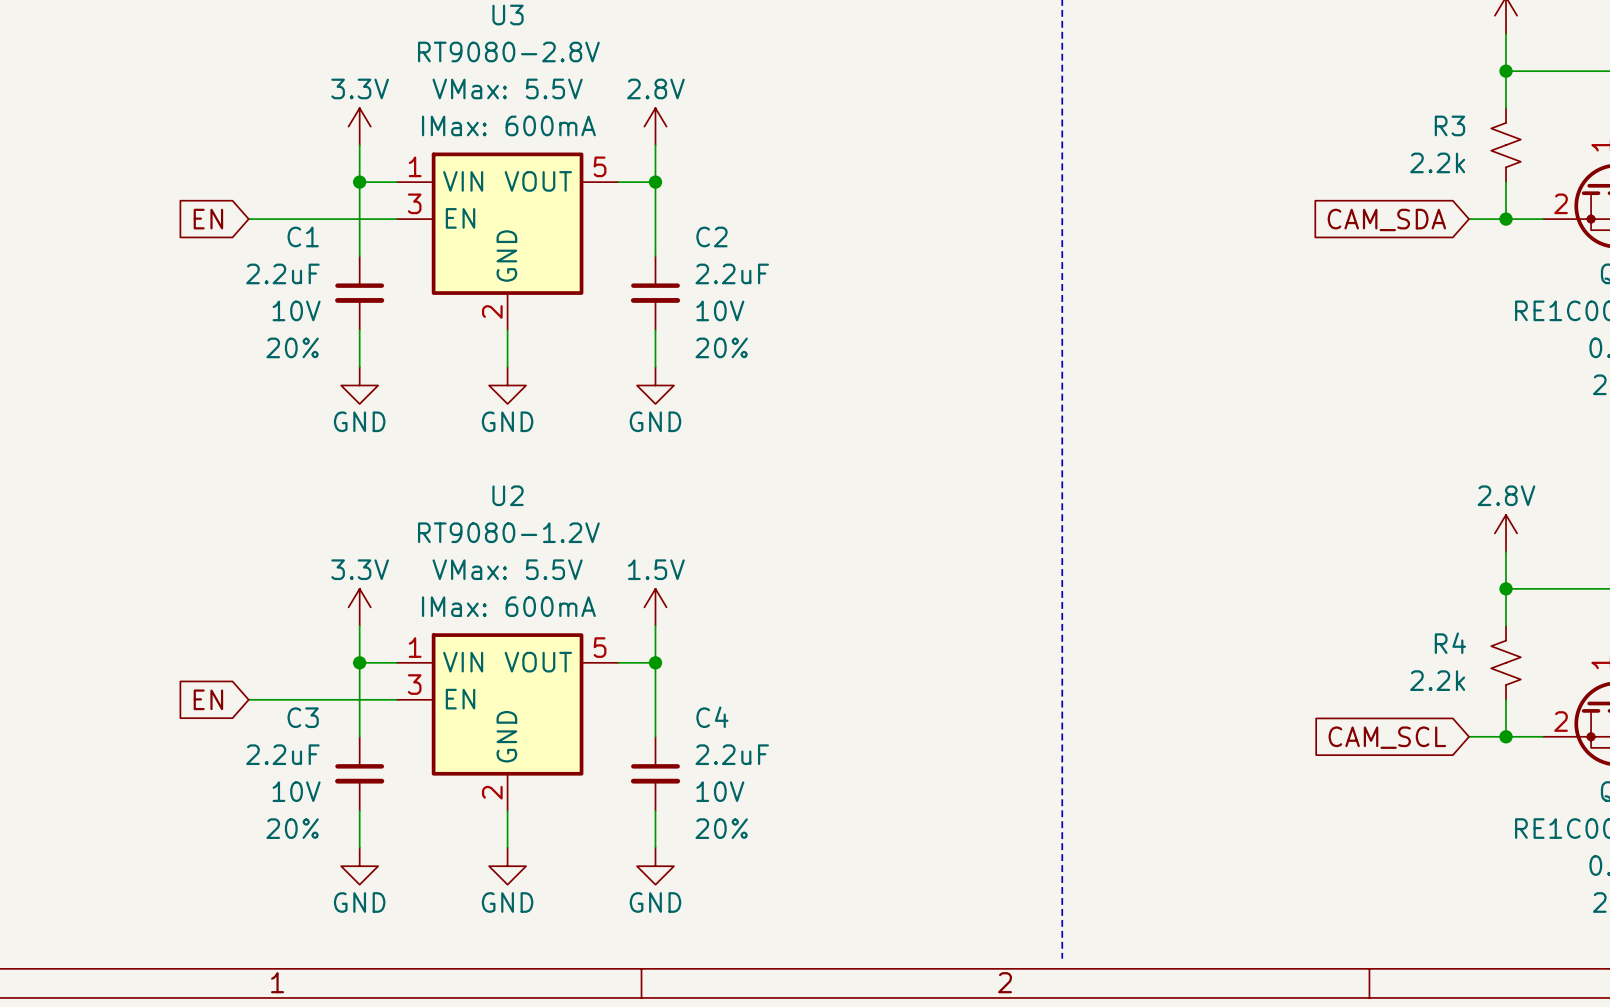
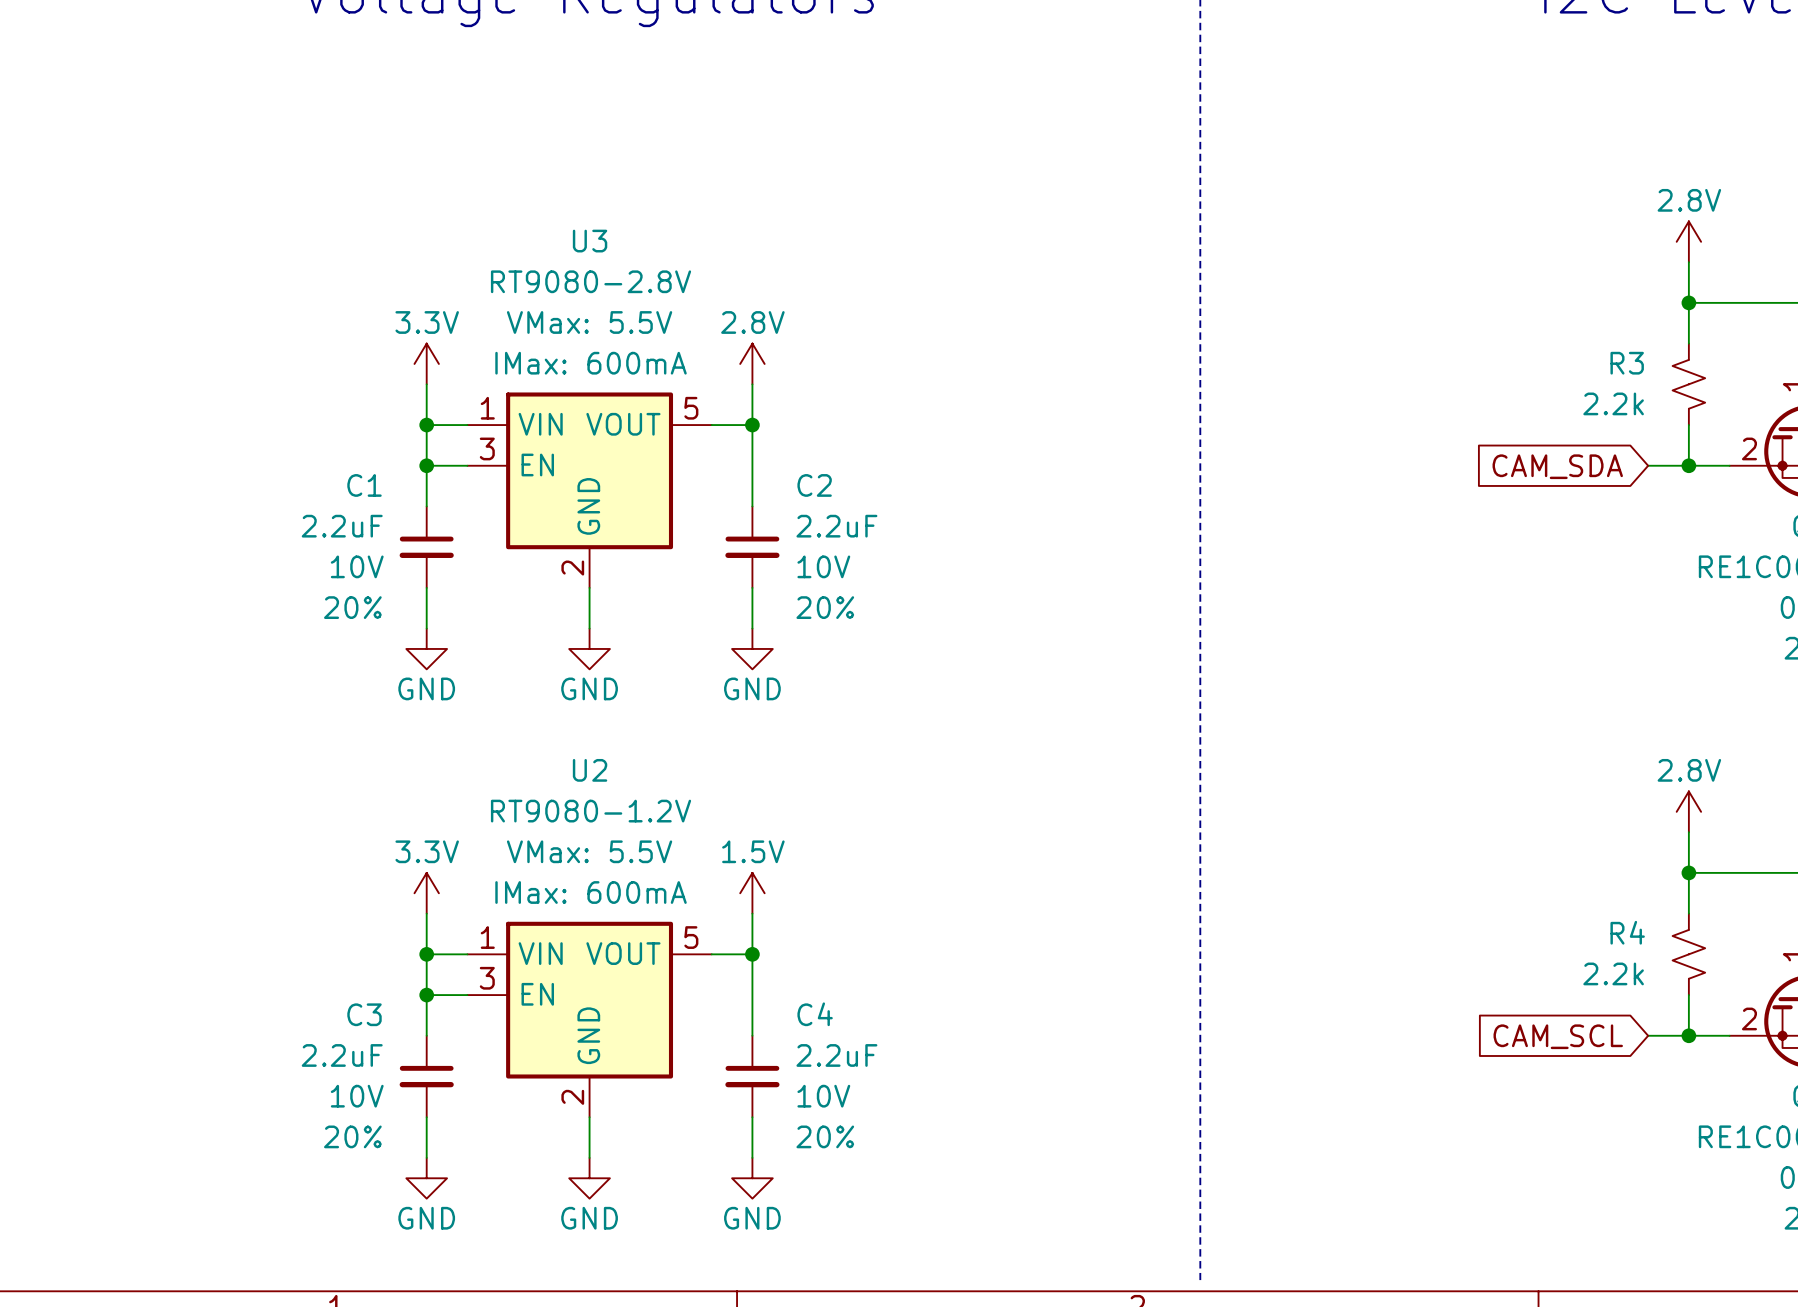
global label: EN (208, 219) -> none
wire: (248, 219) (359, 219) -> none
junction: none -> (426, 465)
global label: EN (208, 699) -> none
wire: (248, 699) (359, 699) -> none
junction: none -> (426, 995)

